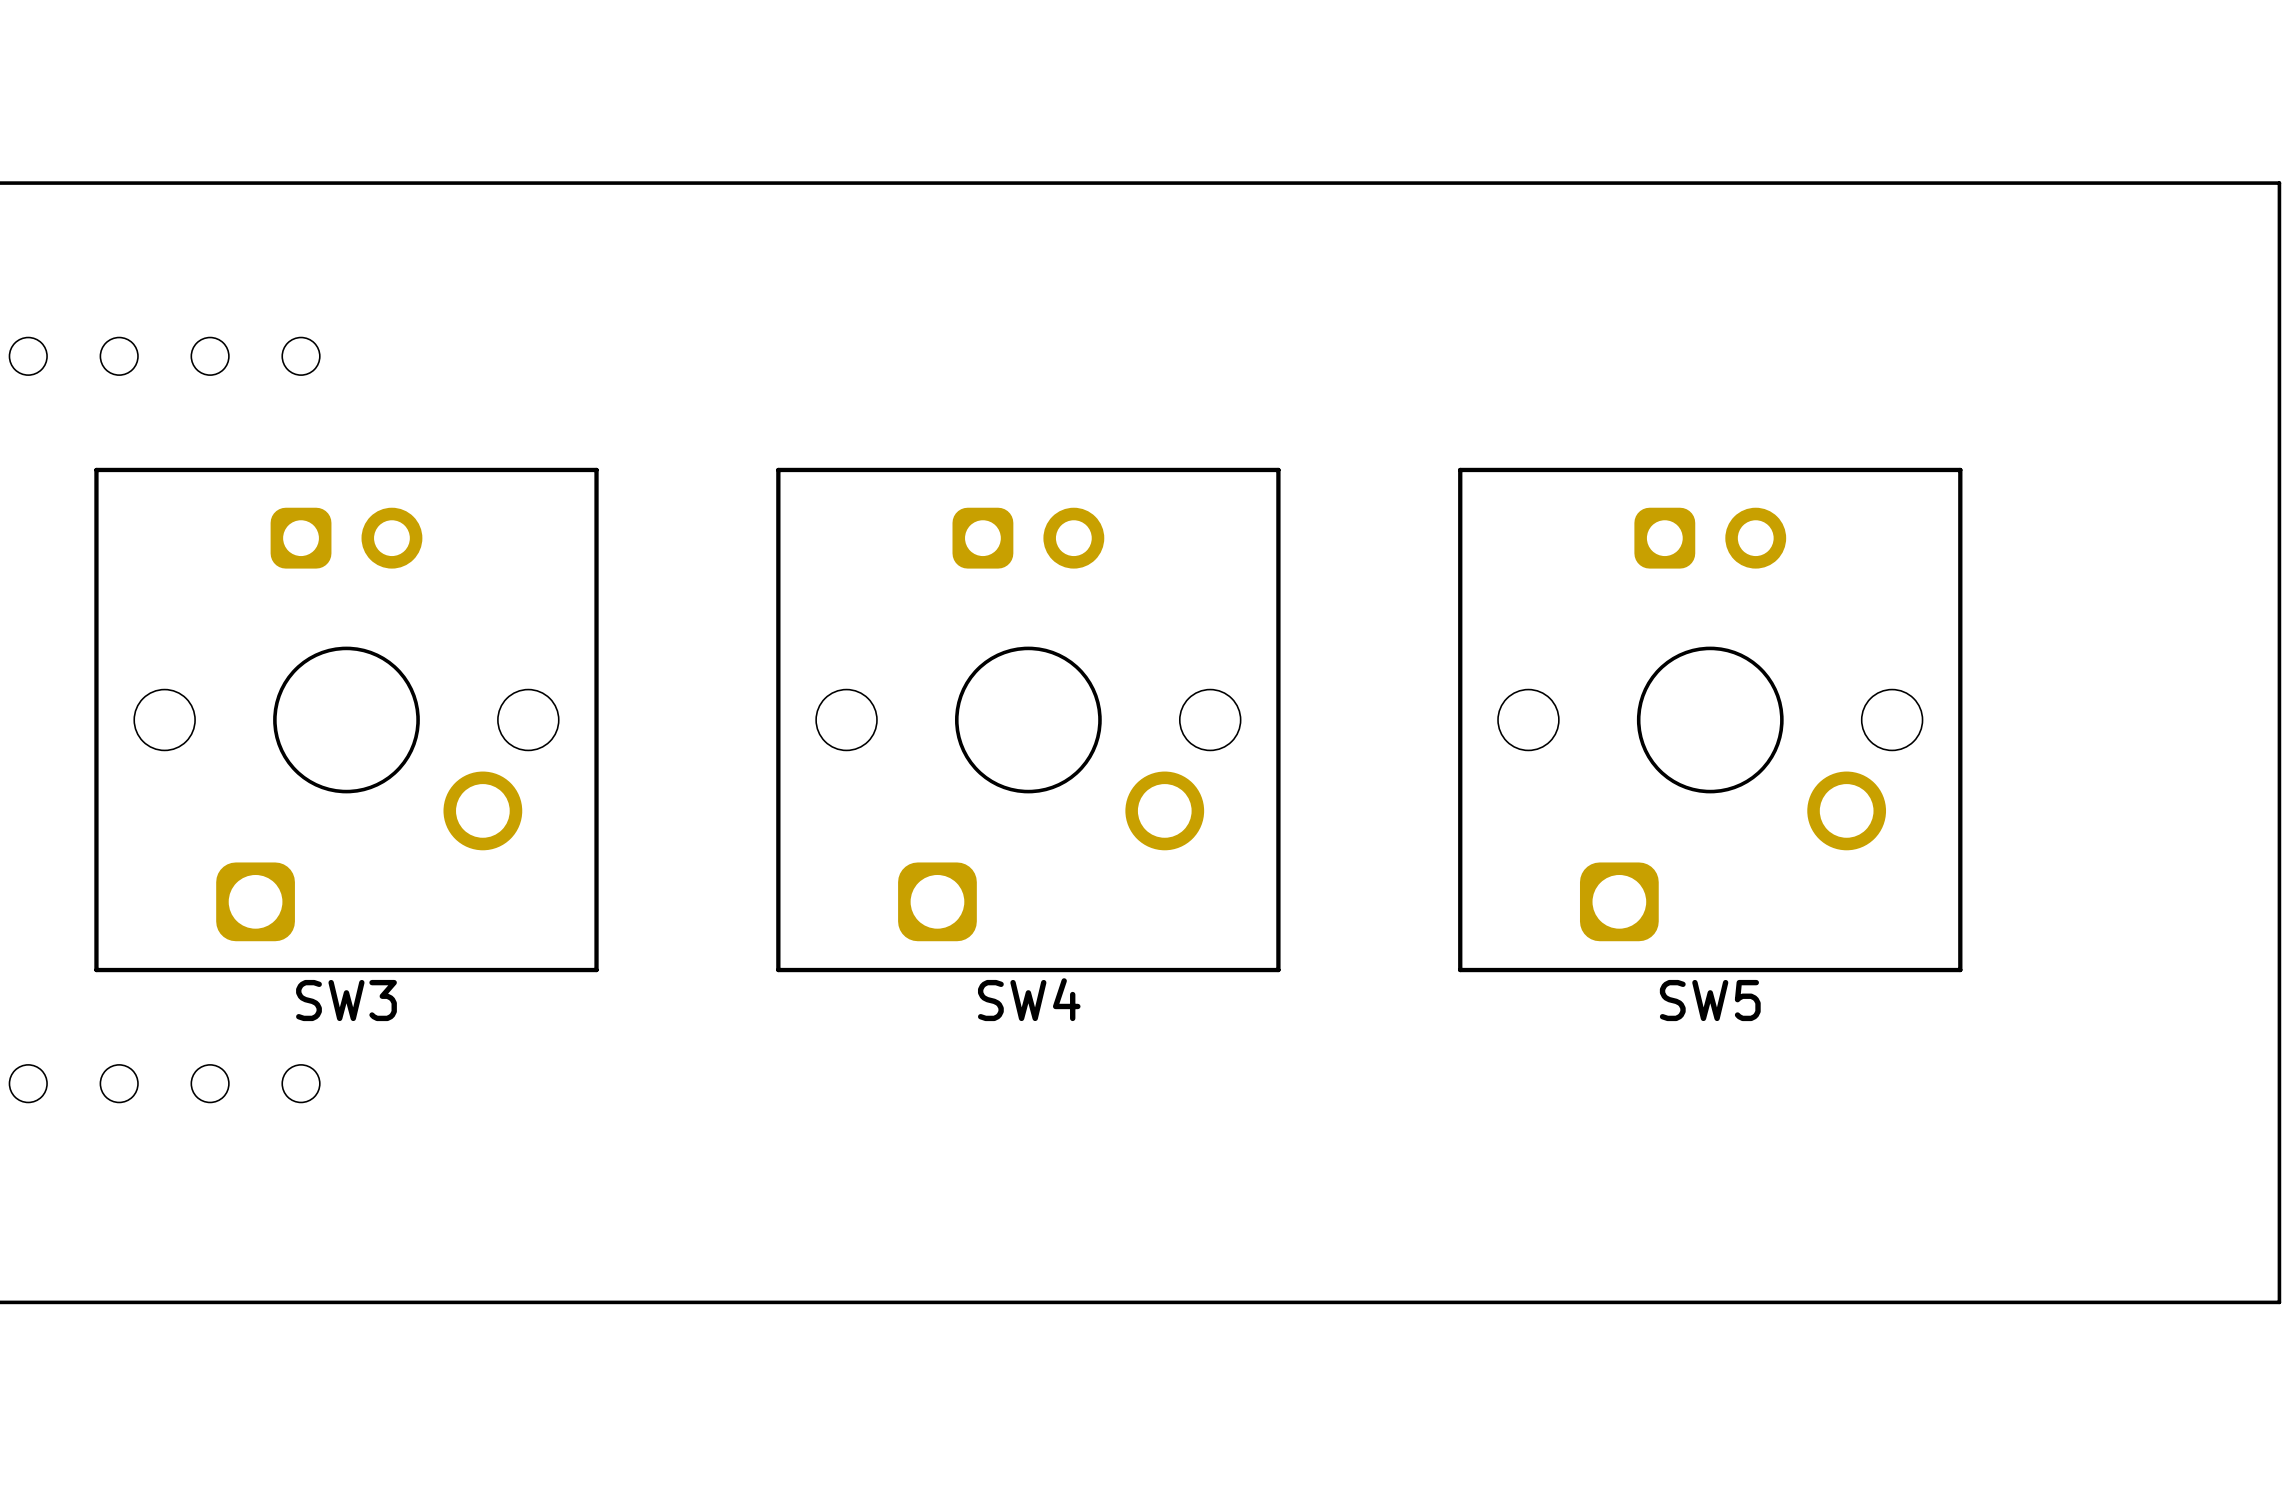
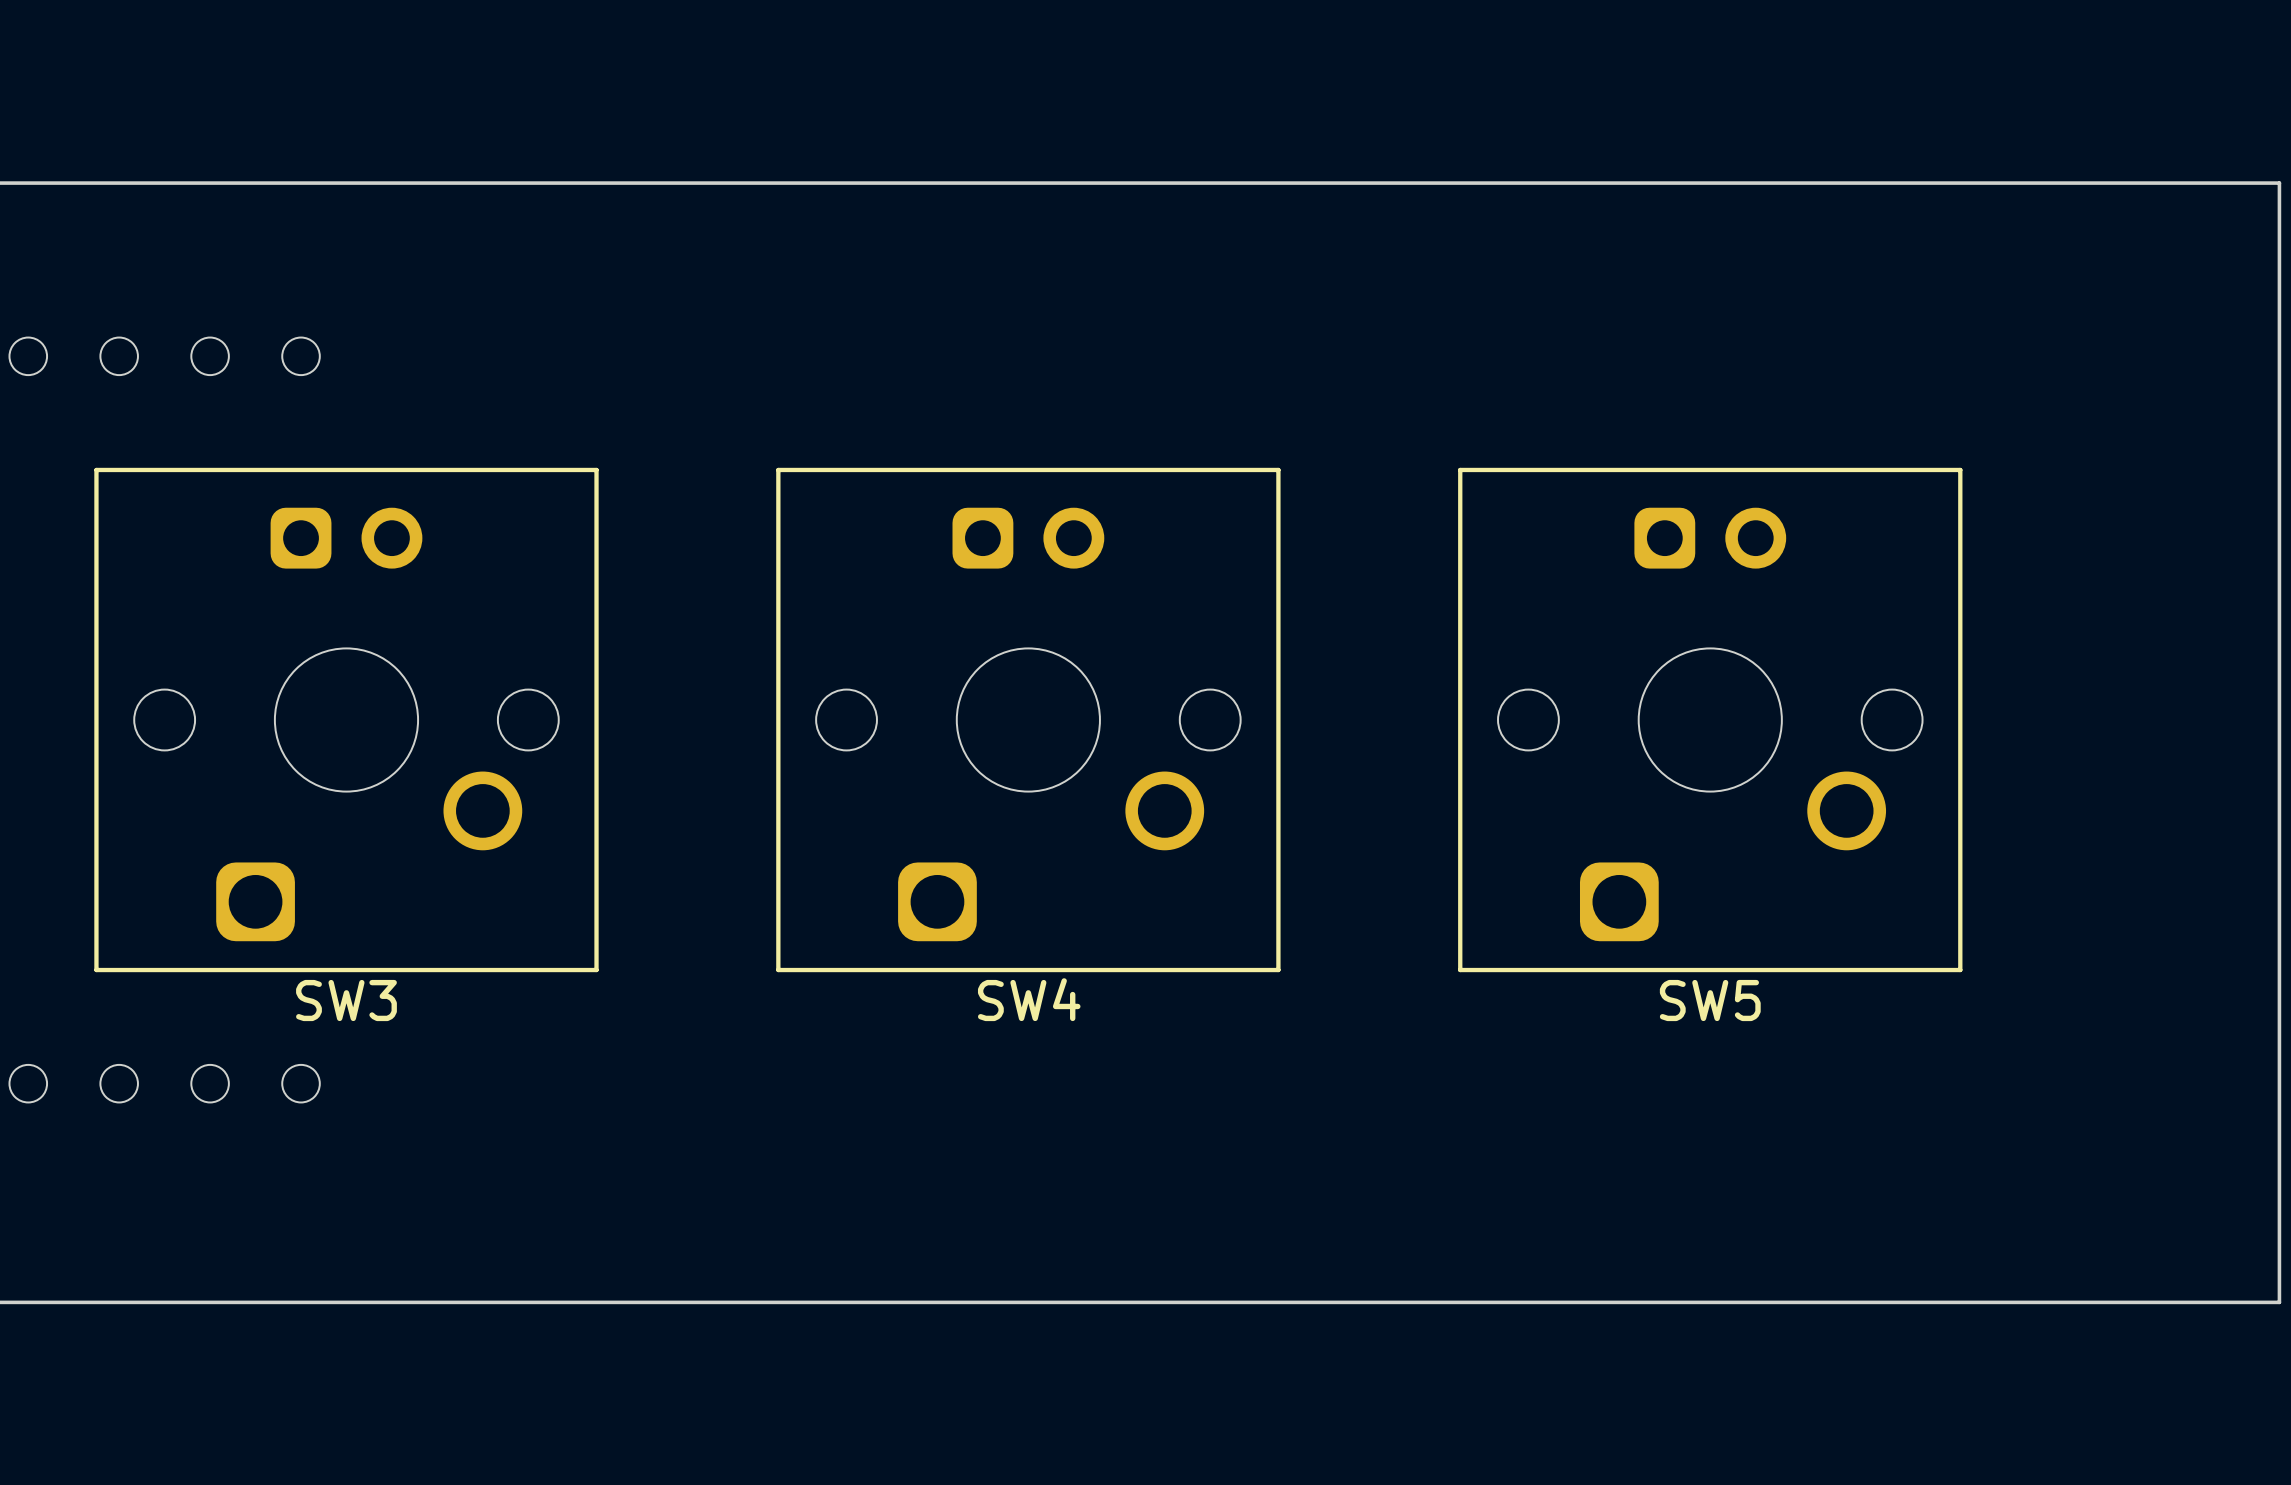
round board edge: [273, 646, 420, 794] -> none
round board edge: [955, 646, 1102, 794] -> none
round board edge: [1636, 646, 1784, 794] -> none

